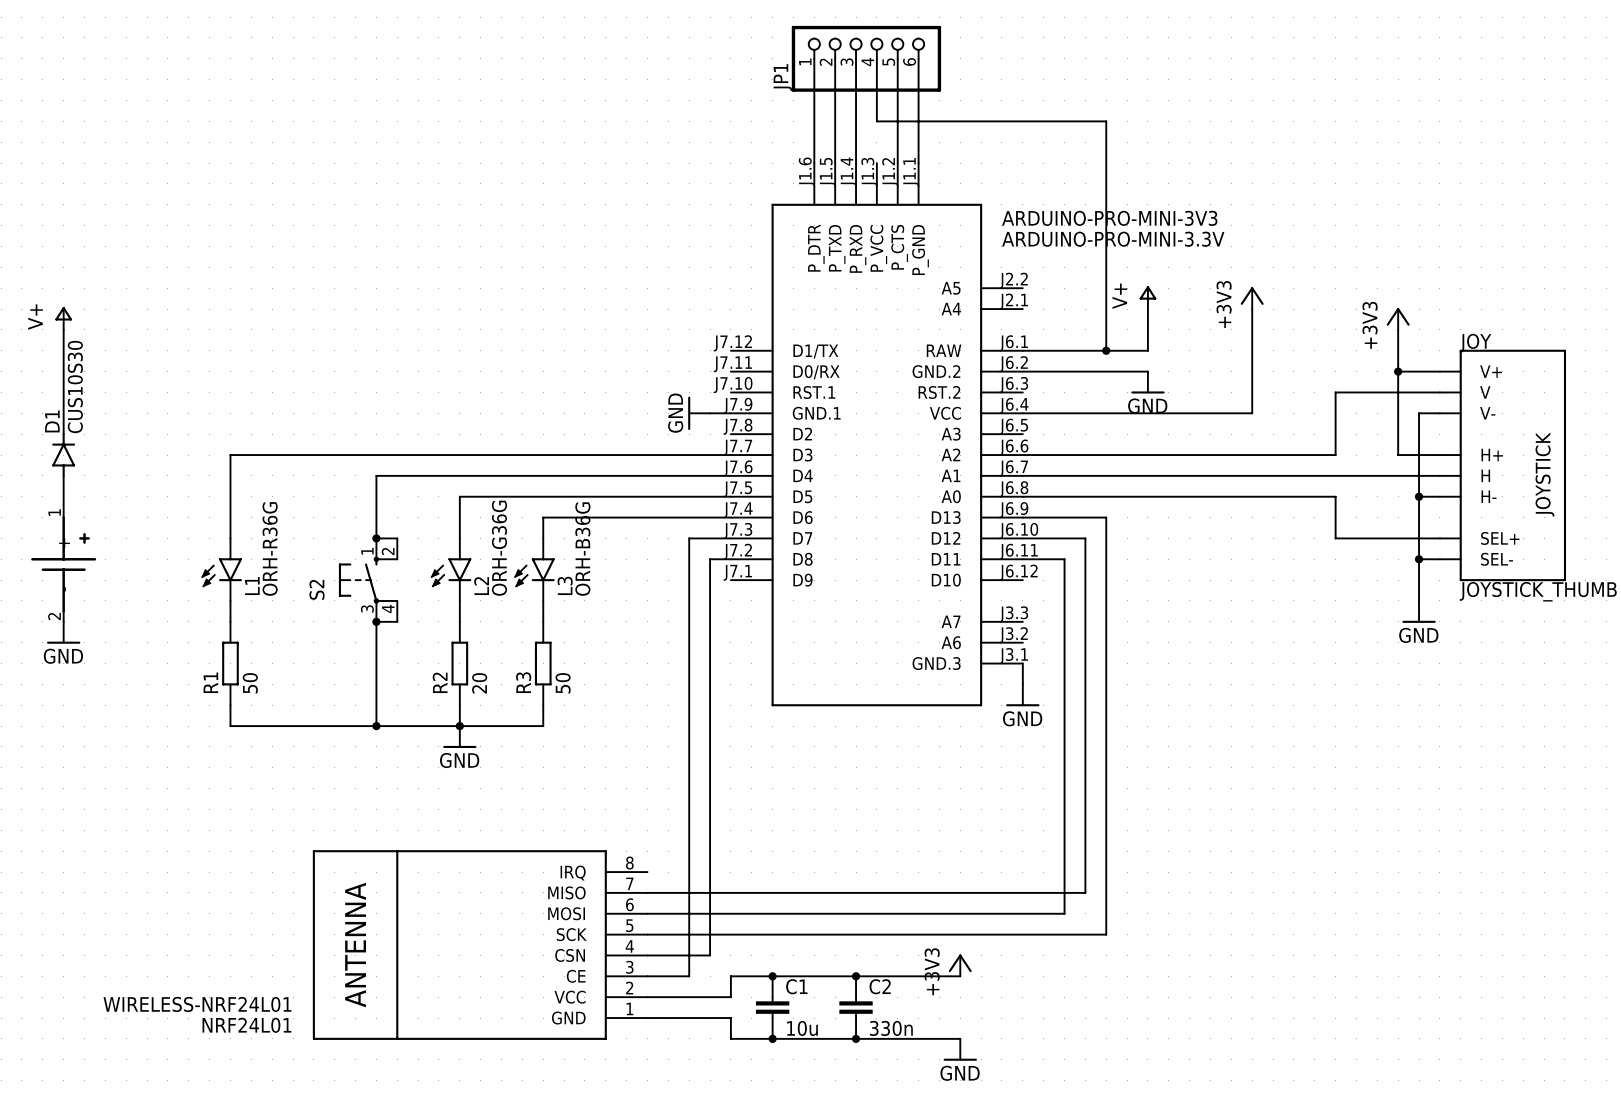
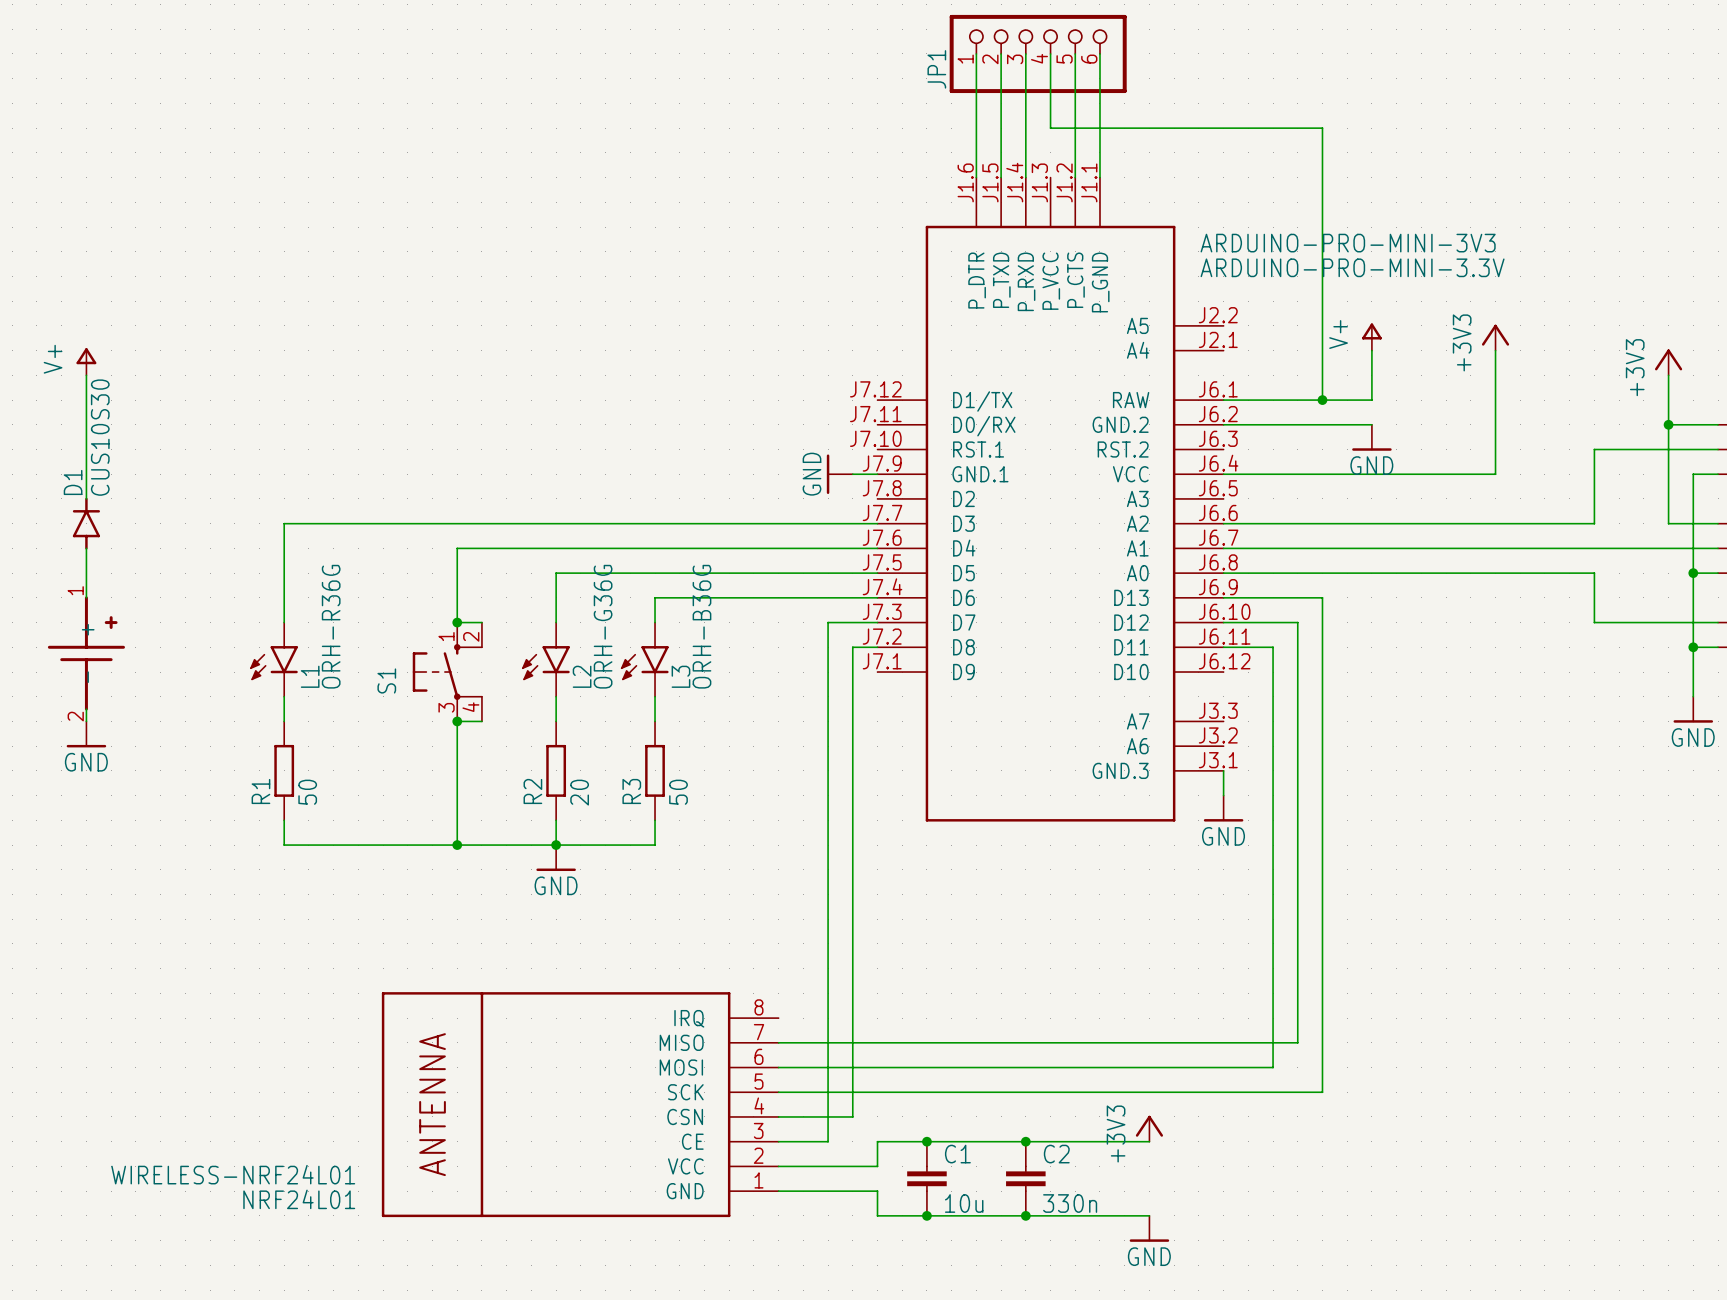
S2 name: S2 (317, 589) -> S1 (386, 680)

